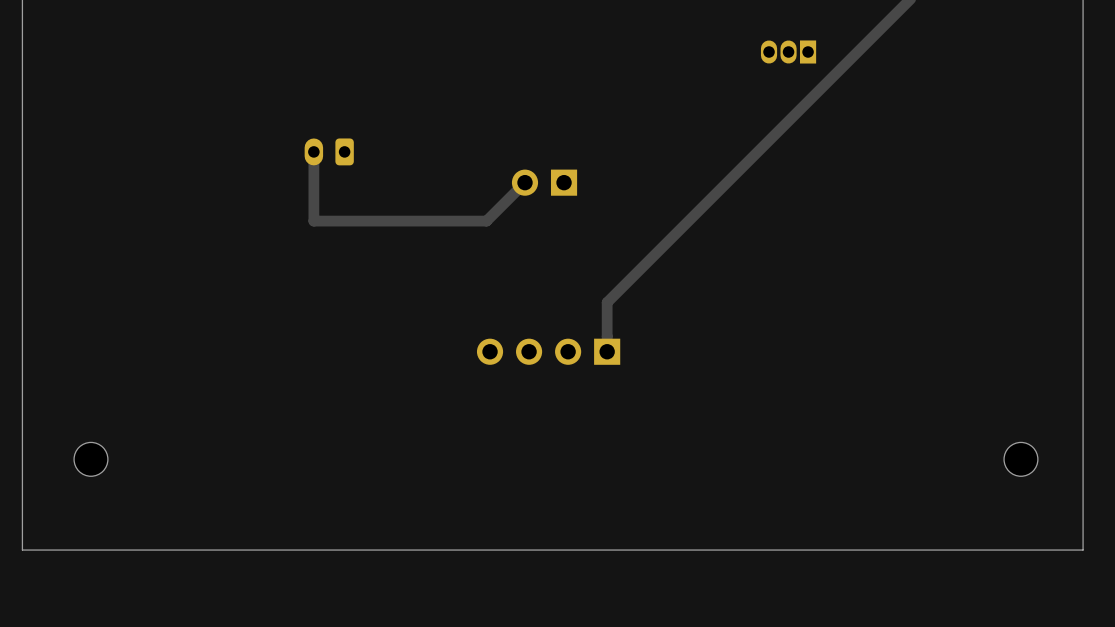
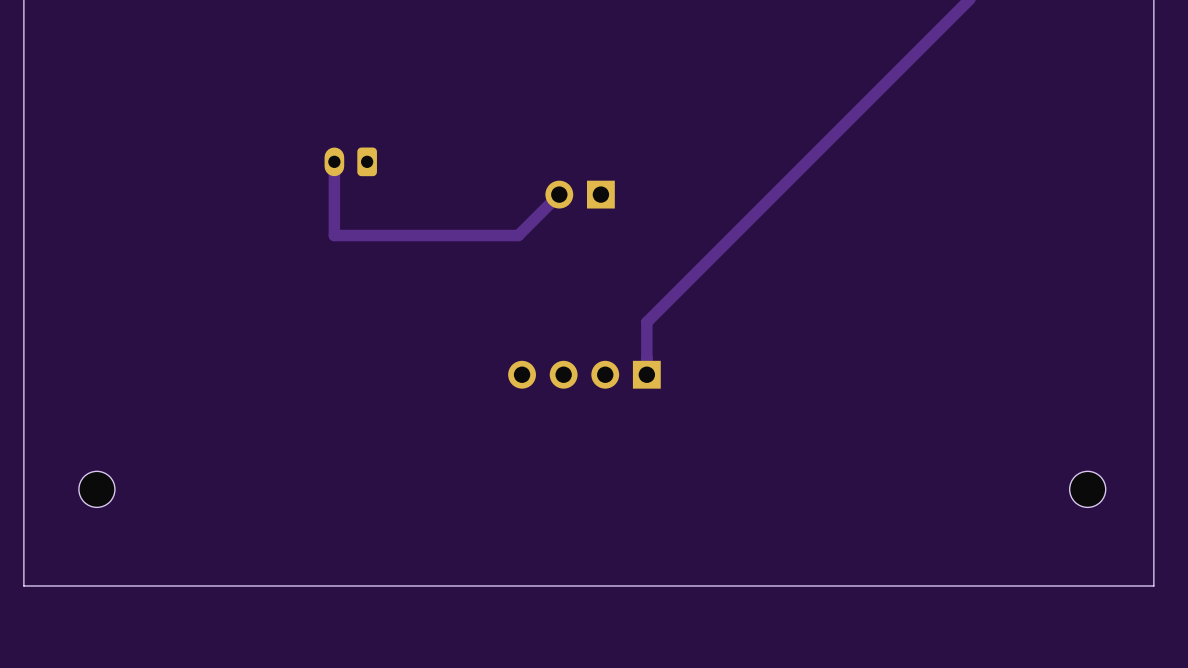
part: (788, 52) -> none

